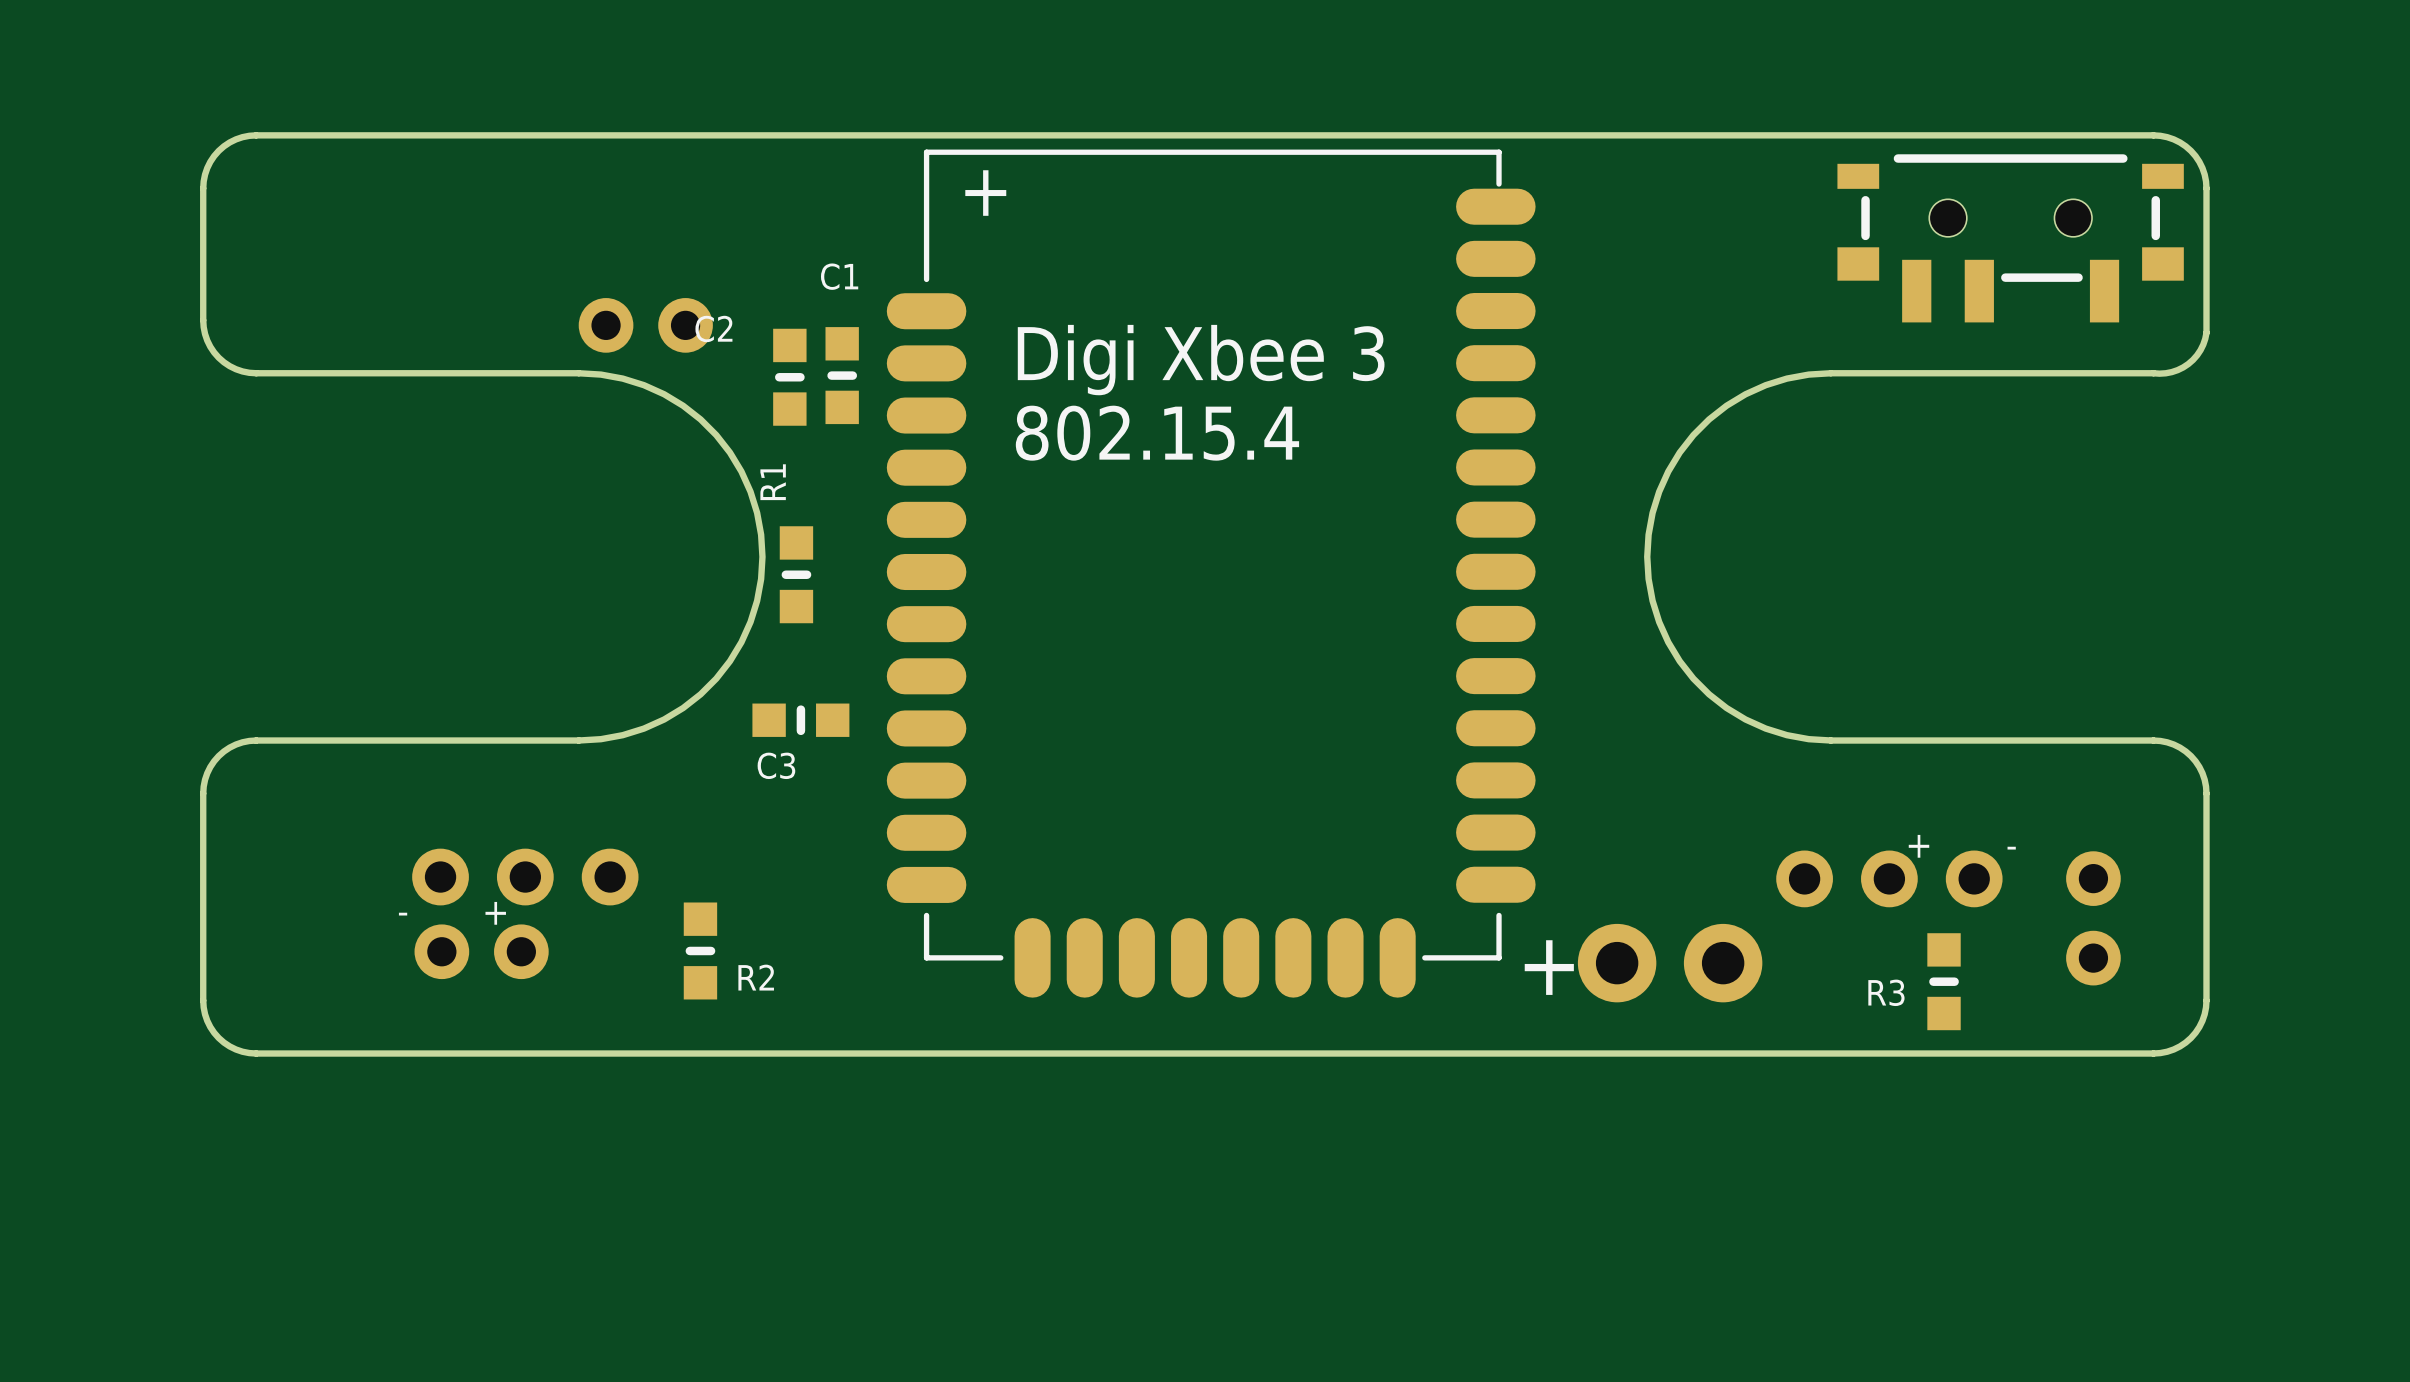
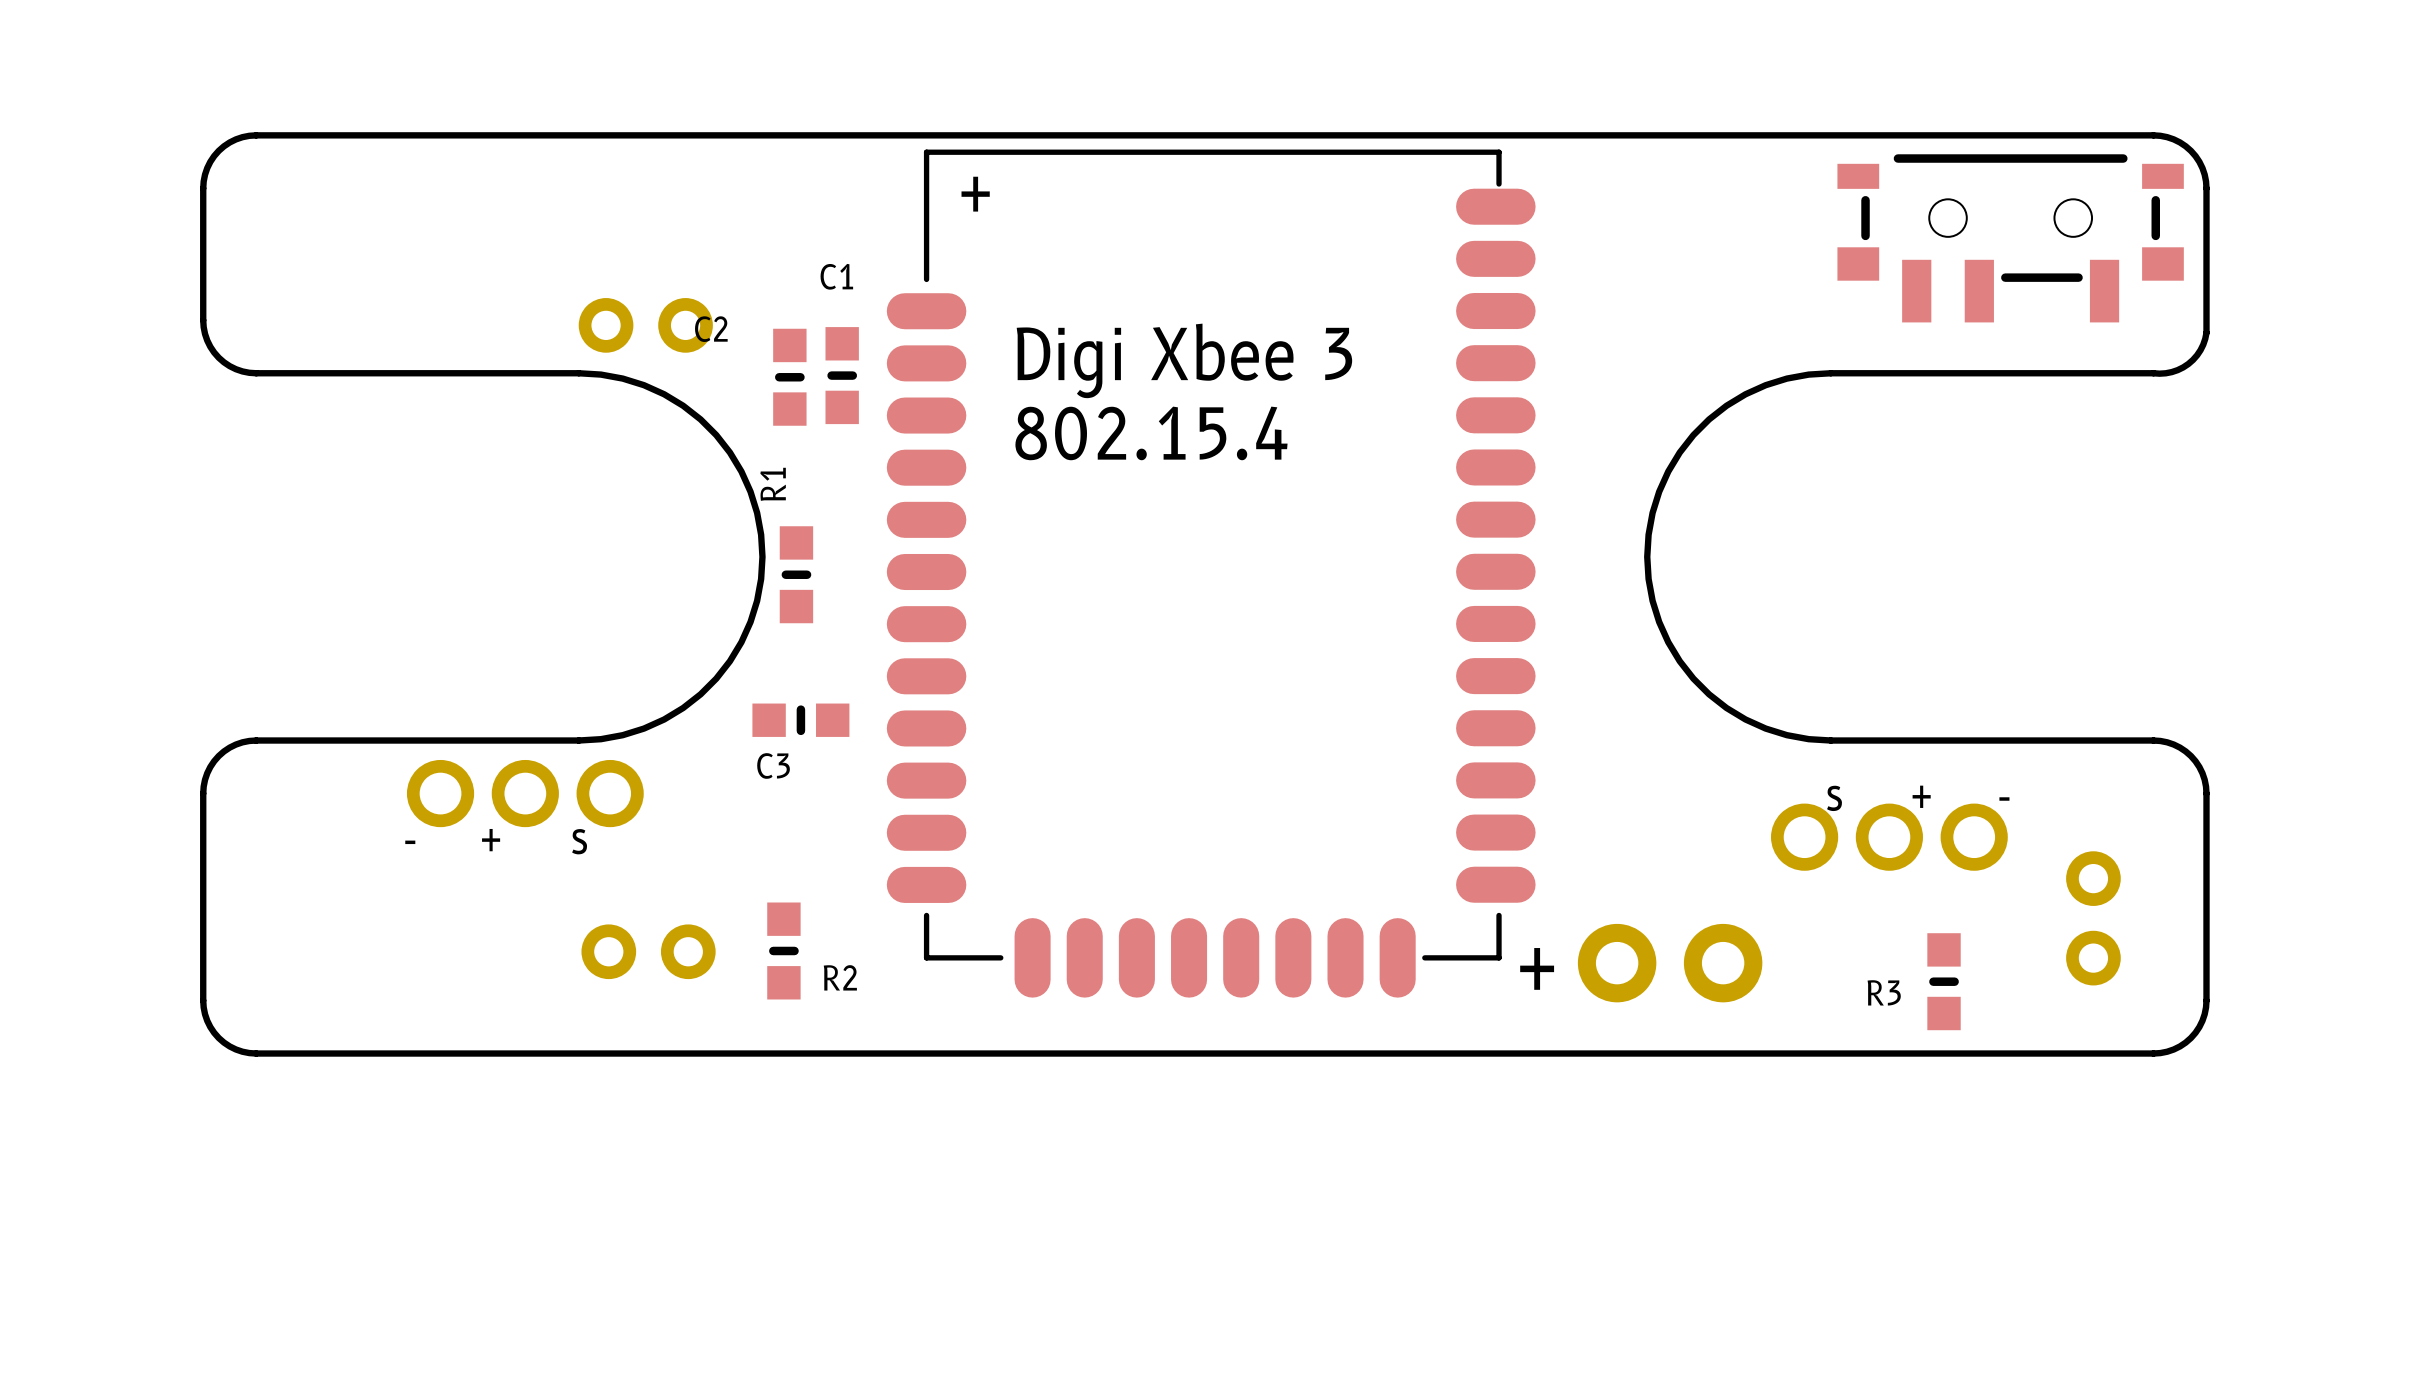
part: none -> (525, 793)
part footprint: [1776, 850, 2003, 908] -> [1771, 803, 2008, 871]
part: (525, 877) -> none
R2 position: (700, 950) -> (783, 950)
part position: (481, 951) -> (648, 951)

